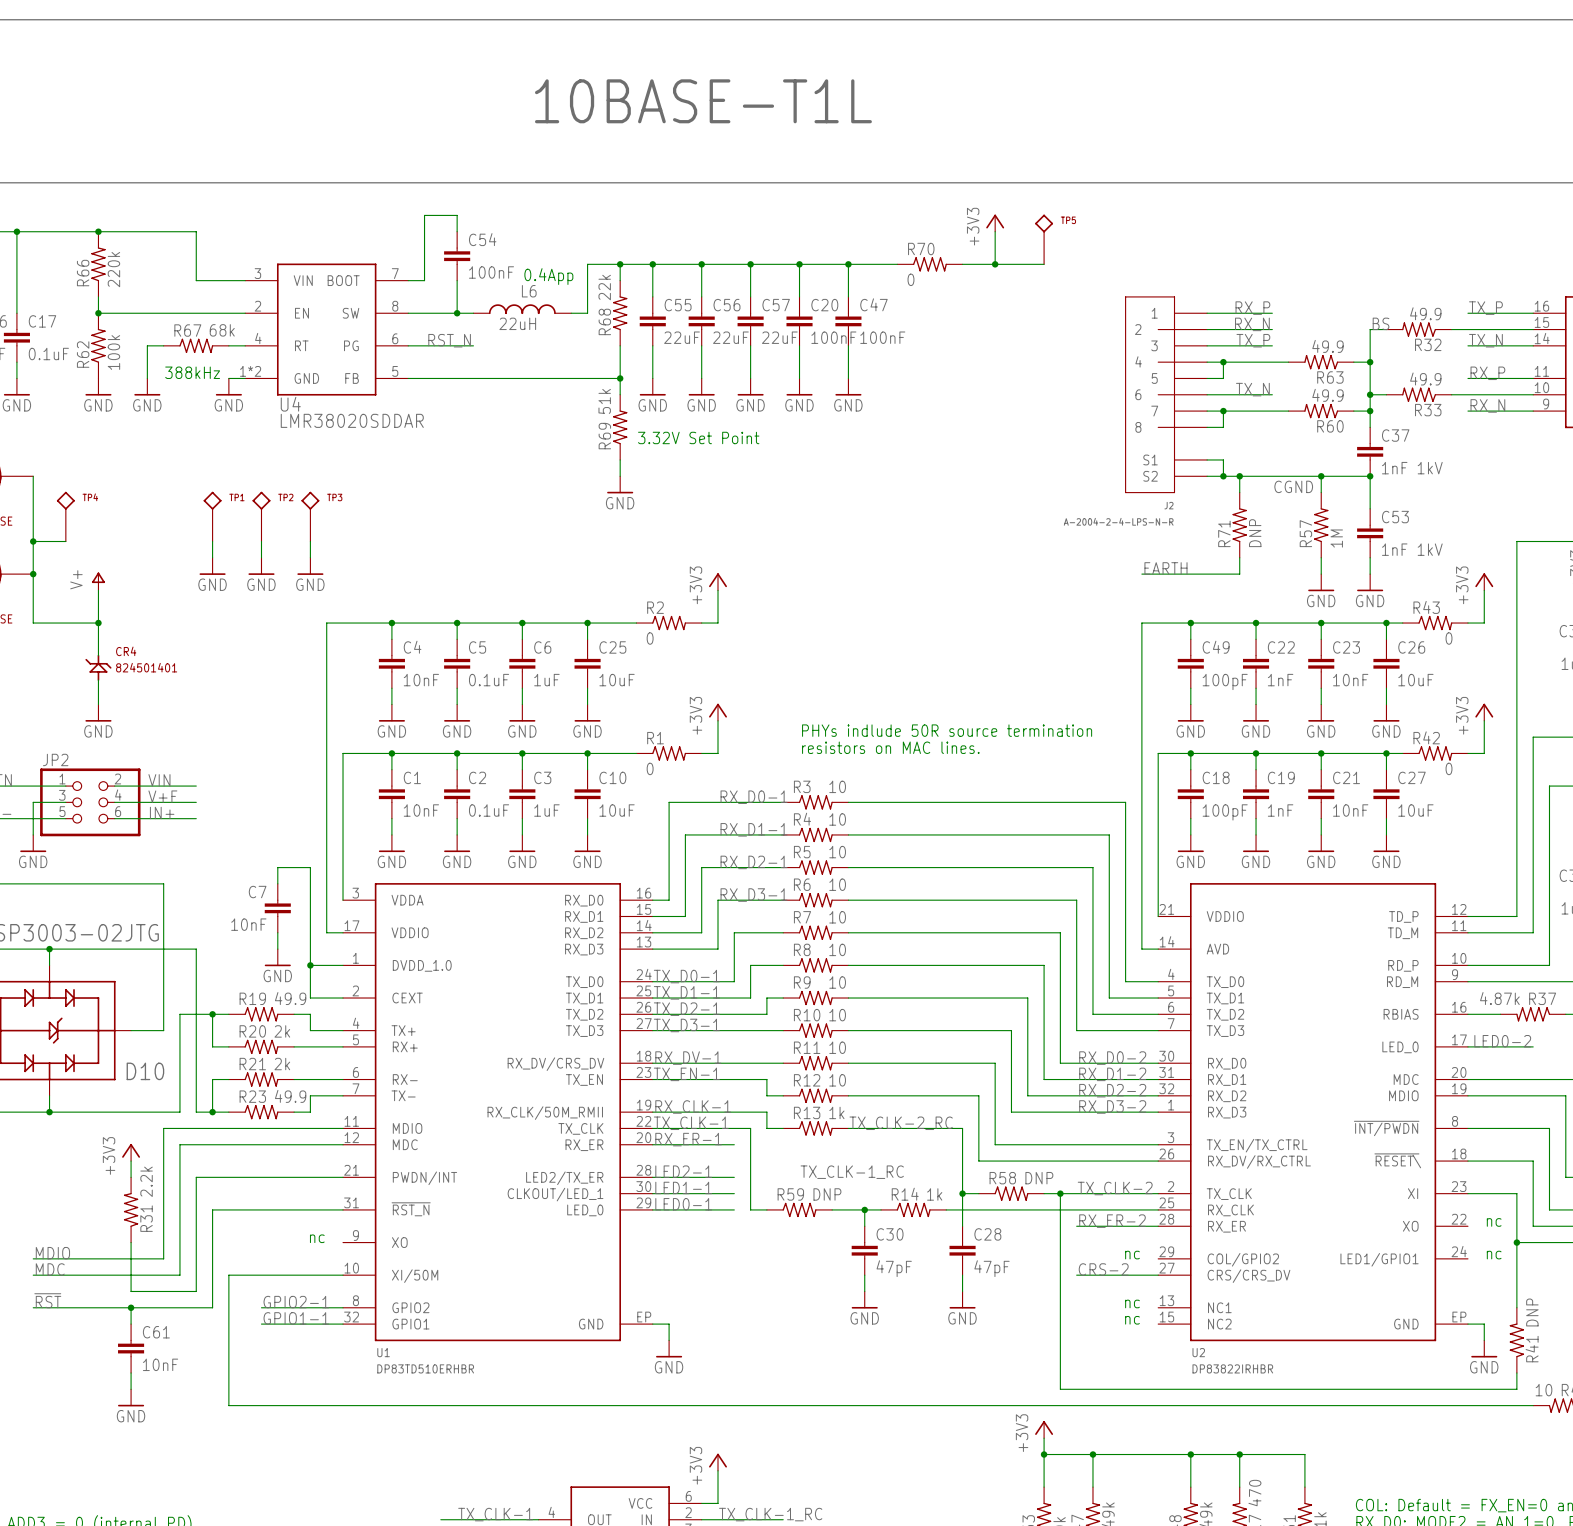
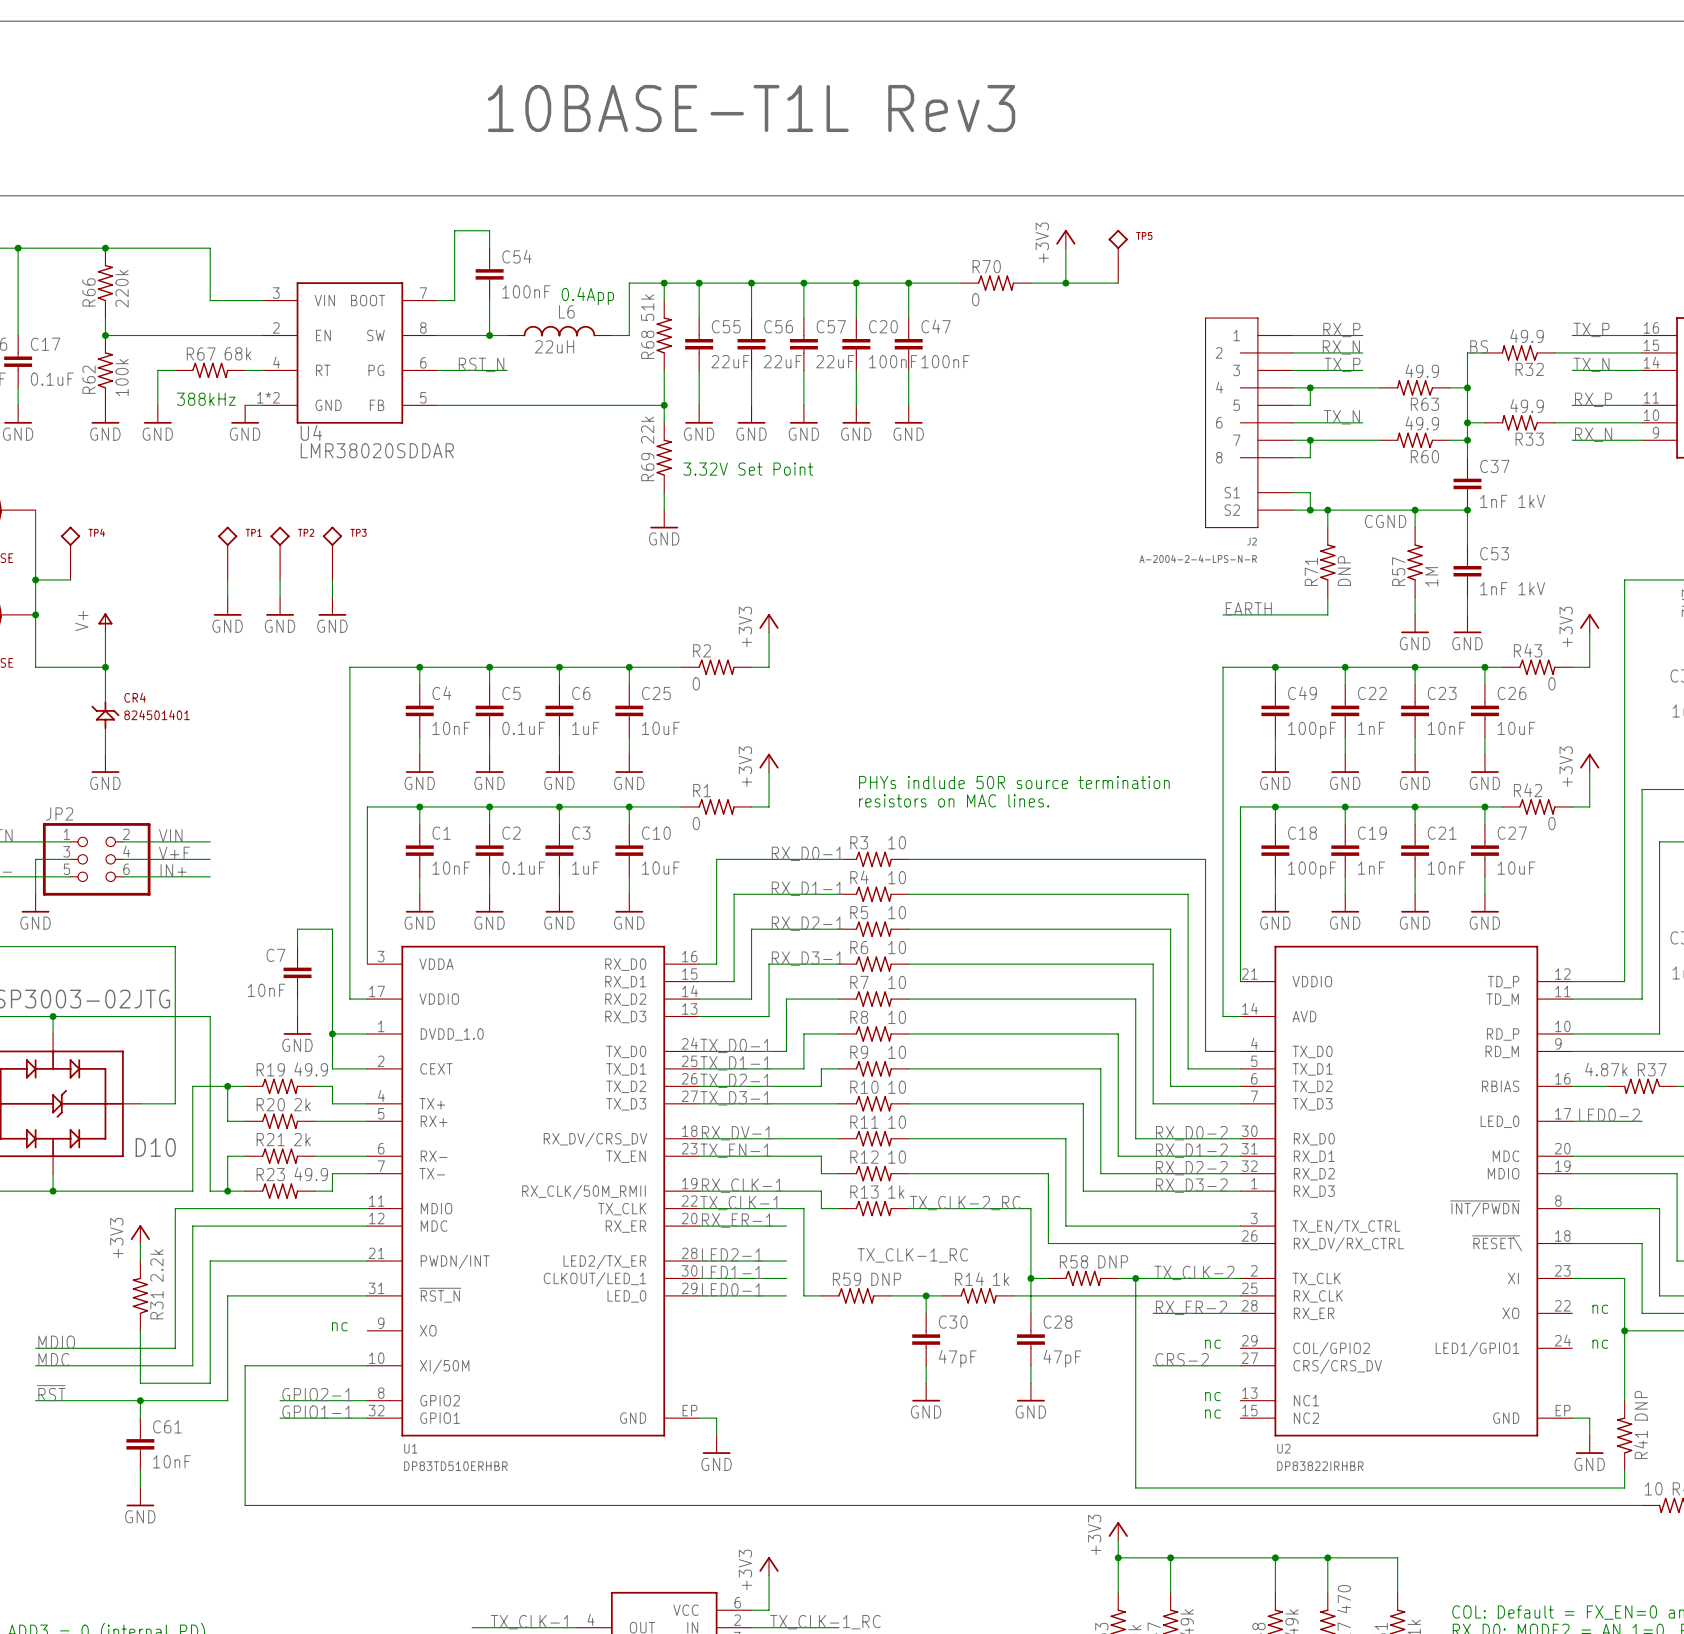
text: 10BASE-T1L (703, 101) -> 10BASE-T1L Rev3 (751, 108)
R68 value: 22k (604, 287) -> 51k (647, 307)
R69 value: 51k (604, 401) -> 22k (647, 430)

